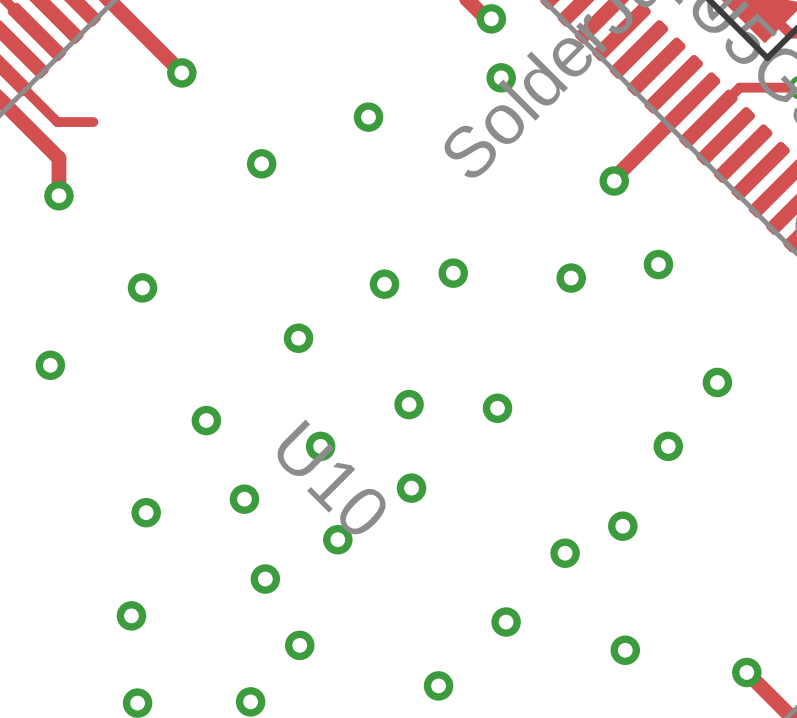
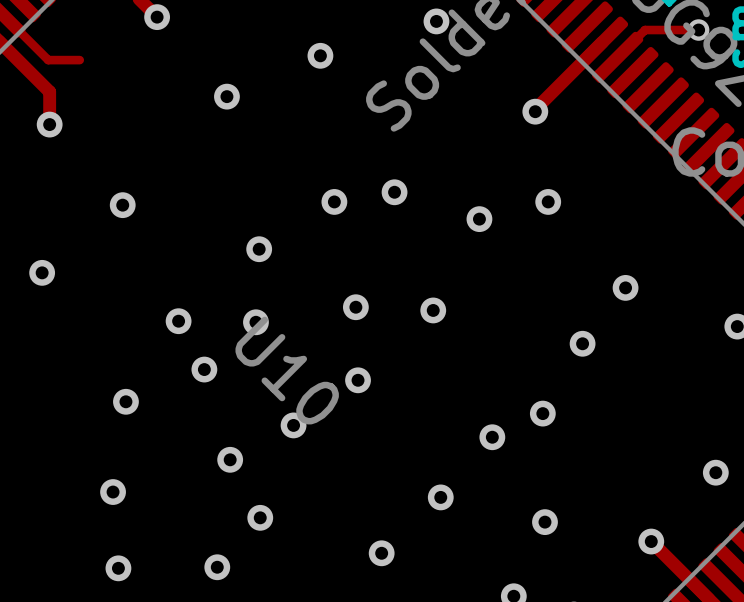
via position: (658, 264) -> (548, 201)
via position: (571, 278) -> (479, 219)
via position: (320, 446) -> (255, 322)
via position: (244, 499) -> (204, 369)

